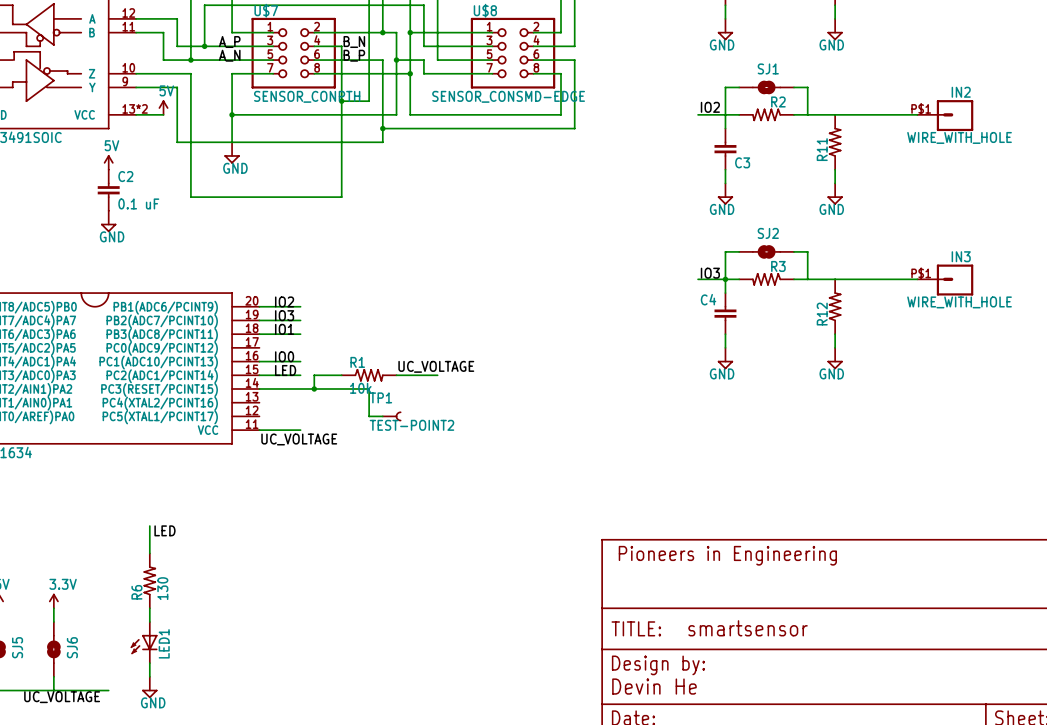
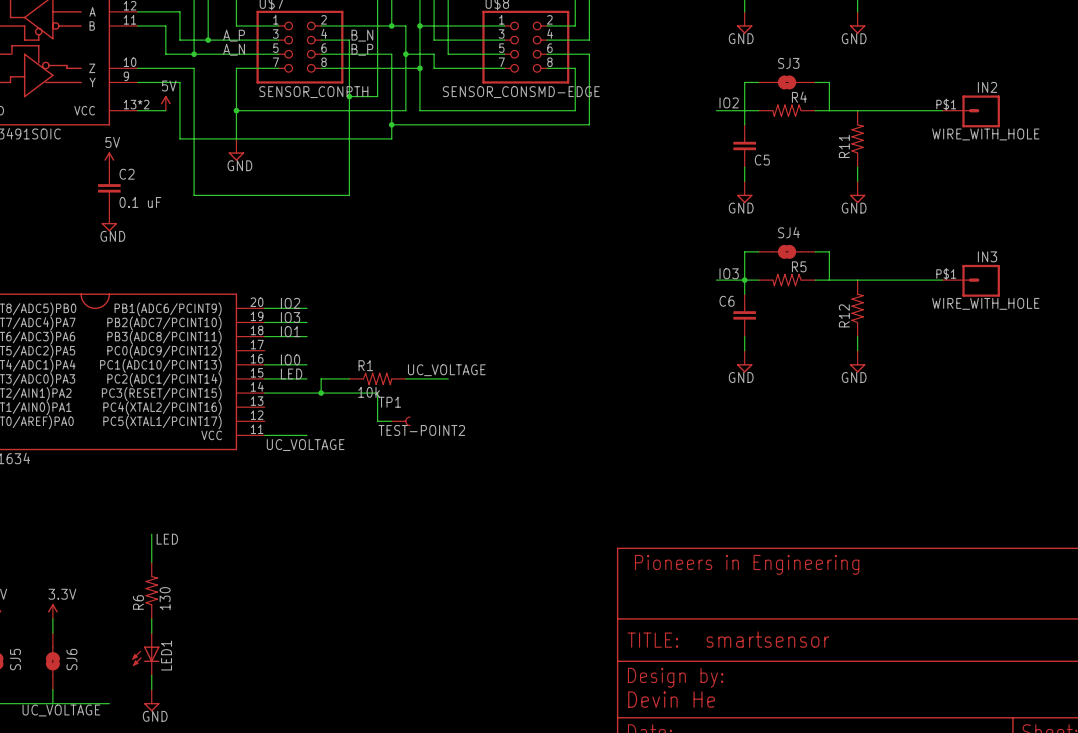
SJ1 name: SJ1 (768, 68) -> SJ3 (788, 63)
R2 name: R2 (778, 101) -> R4 (799, 97)
C3 name: C3 (742, 162) -> C5 (762, 160)
SJ2 name: SJ2 (768, 233) -> SJ4 (788, 232)
R3 name: R3 (778, 266) -> R5 (799, 266)
C4 name: C4 (708, 299) -> C6 (727, 301)

